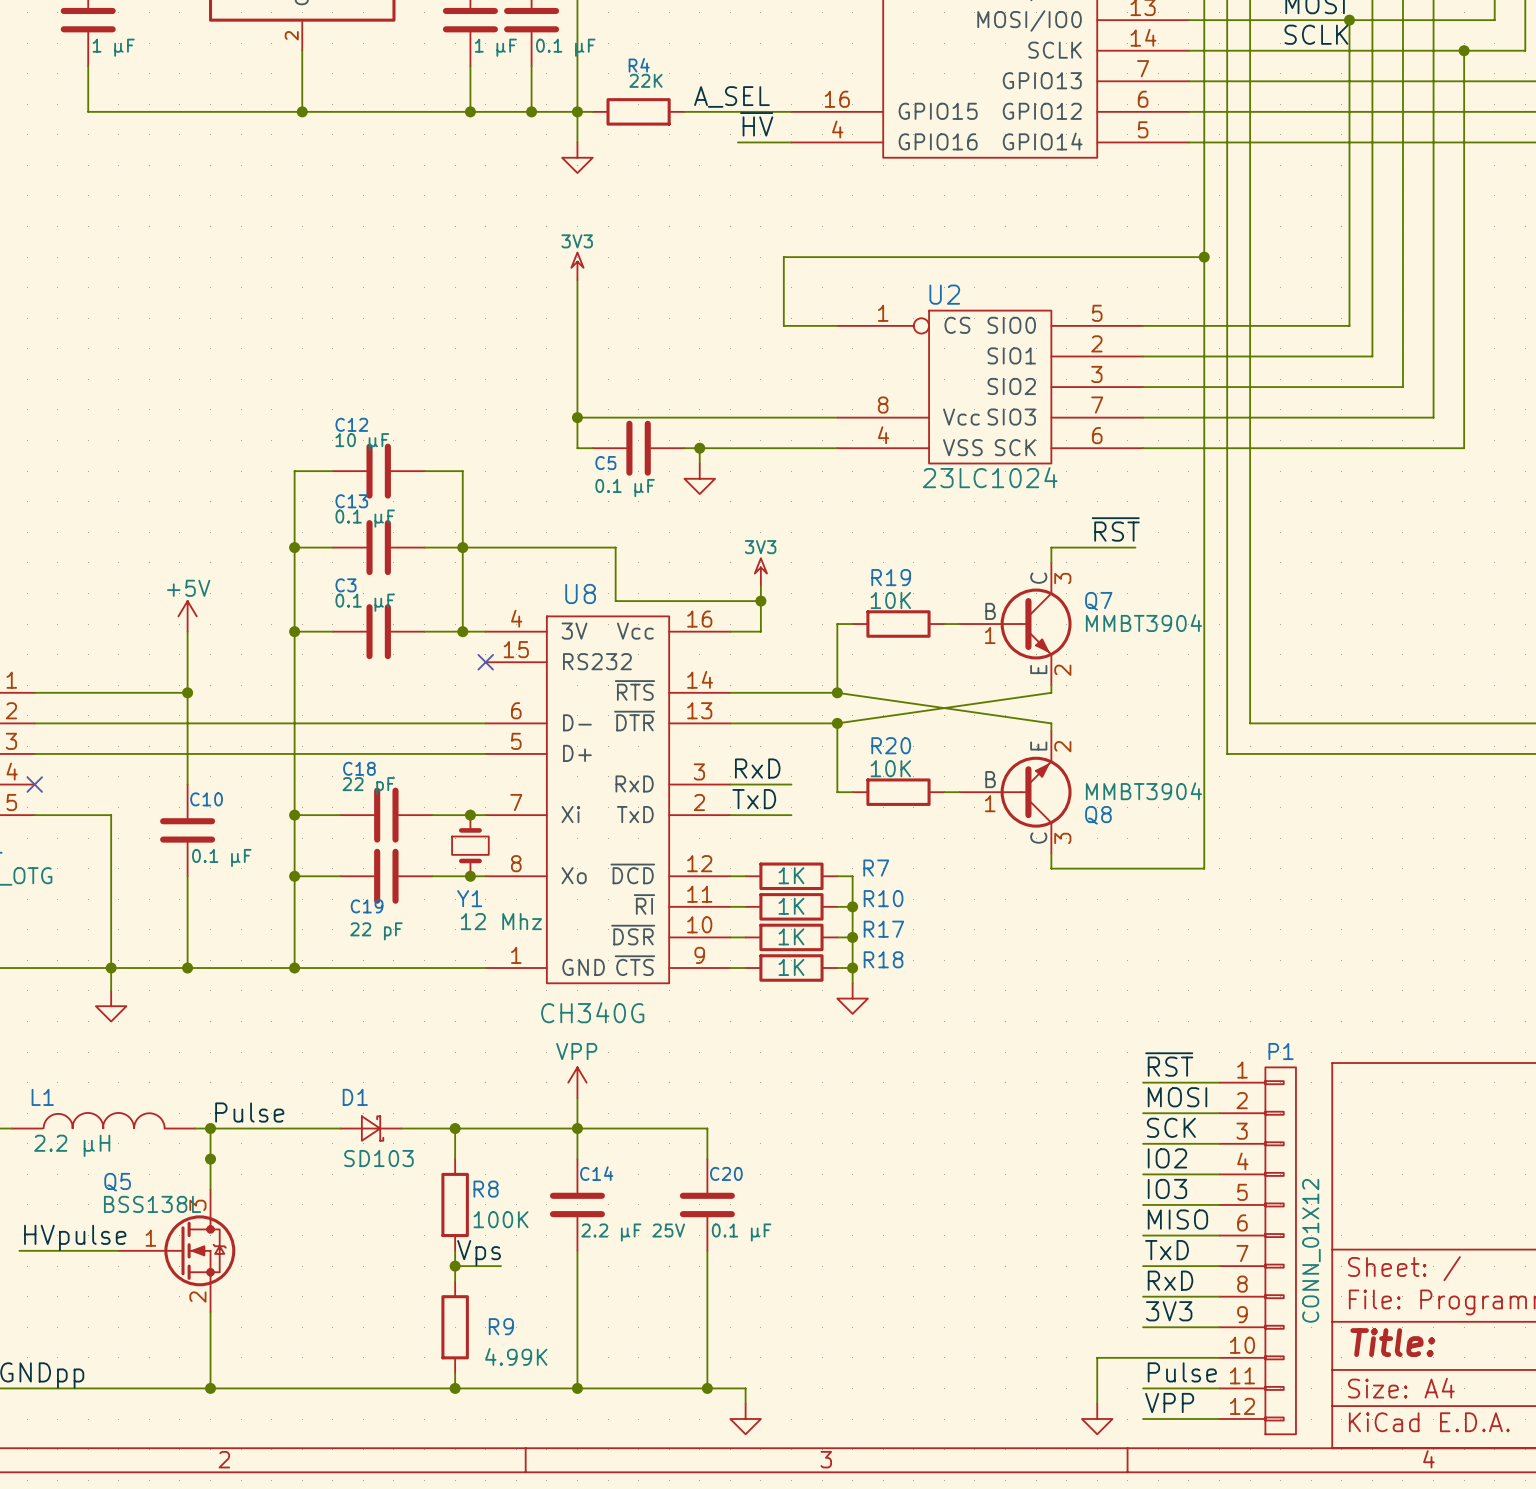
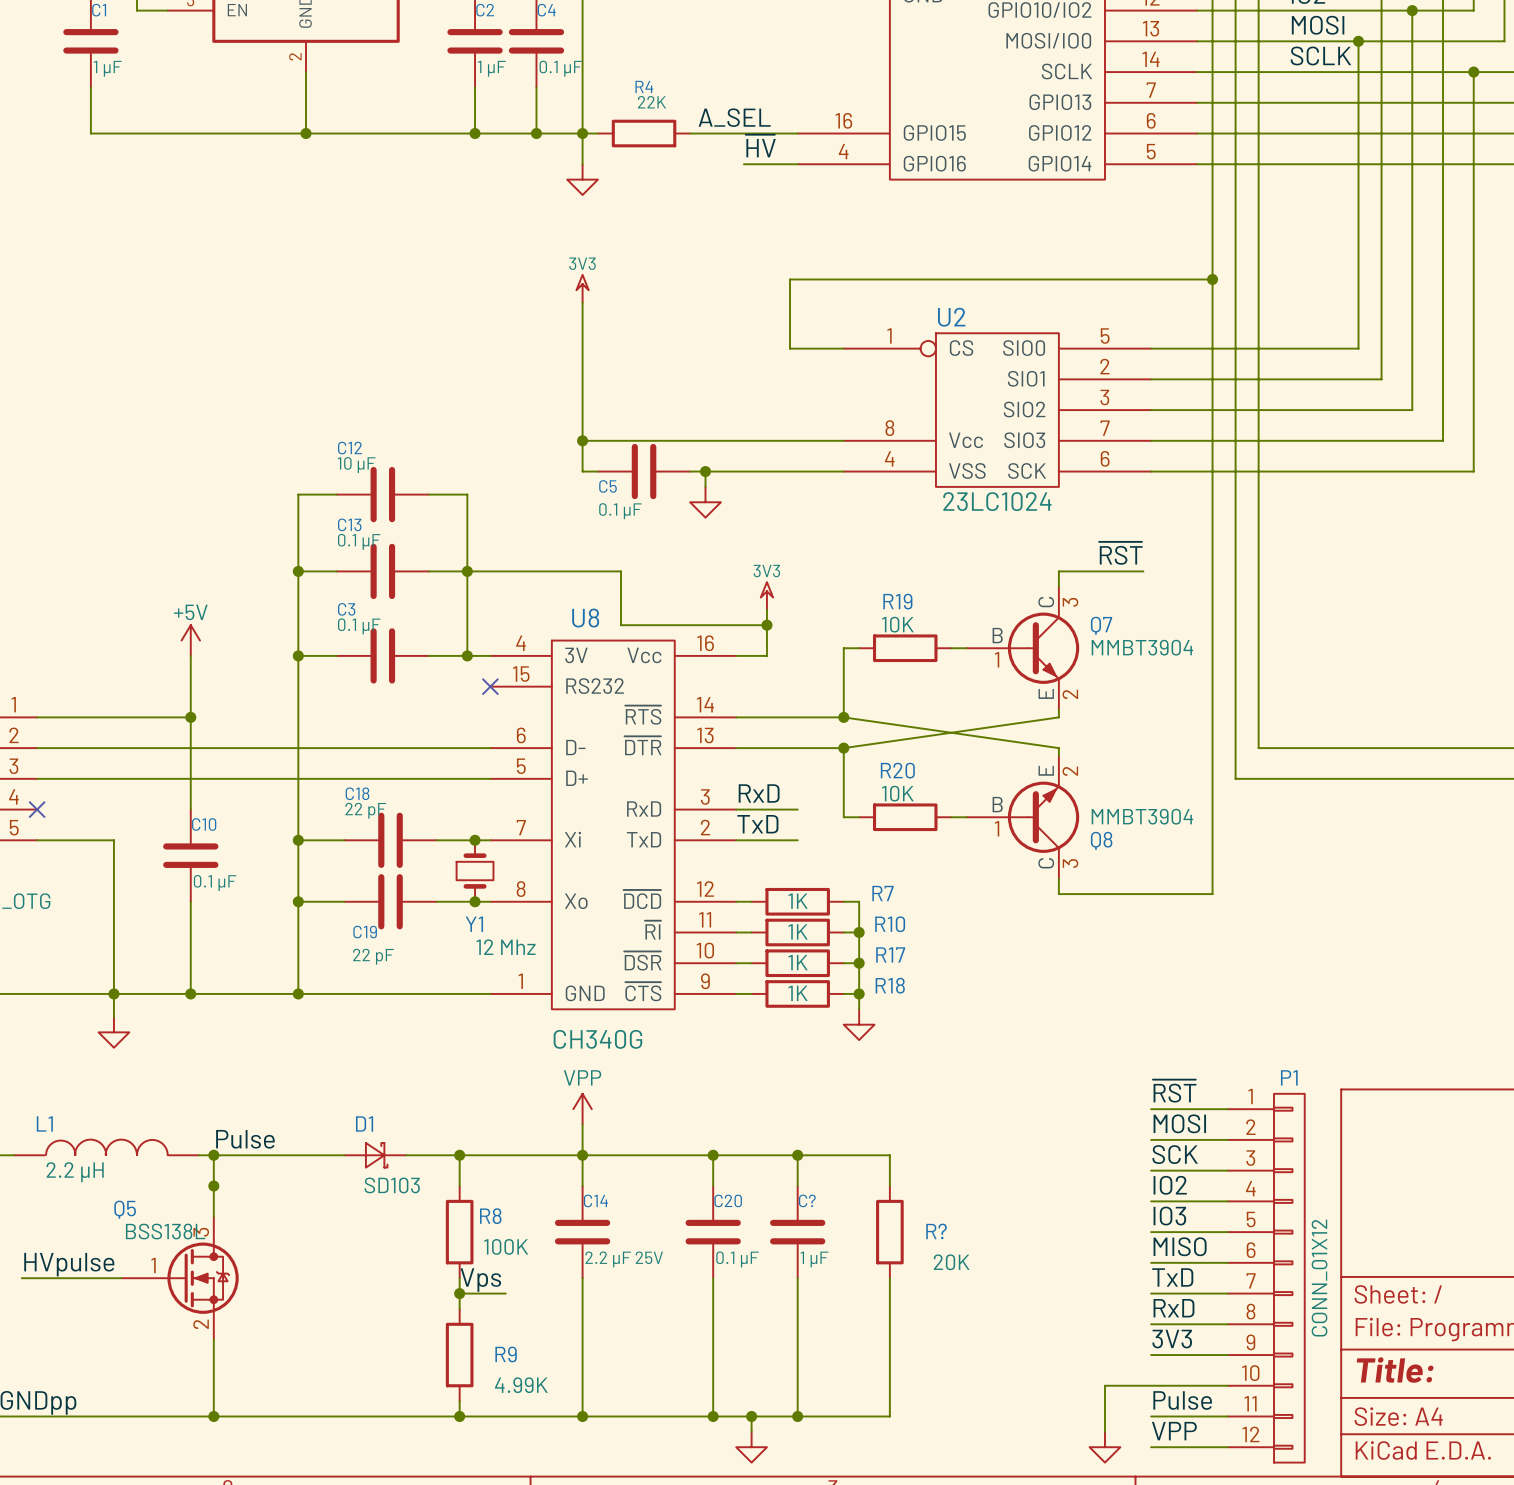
wire: none -> (713, 1155) (889, 1155) (889, 1186)
junction: none -> (713, 1155)
wire: none -> (797, 1155) (797, 1186)
junction: none -> (797, 1155)
C?: none -> 1 µF (797, 1232)
R?: none -> 20K (889, 1232)
wire: none -> (797, 1278) (797, 1416)
wire: none -> (889, 1278) (889, 1416) (751, 1416)
junction: none -> (751, 1416)
junction: none -> (797, 1416)

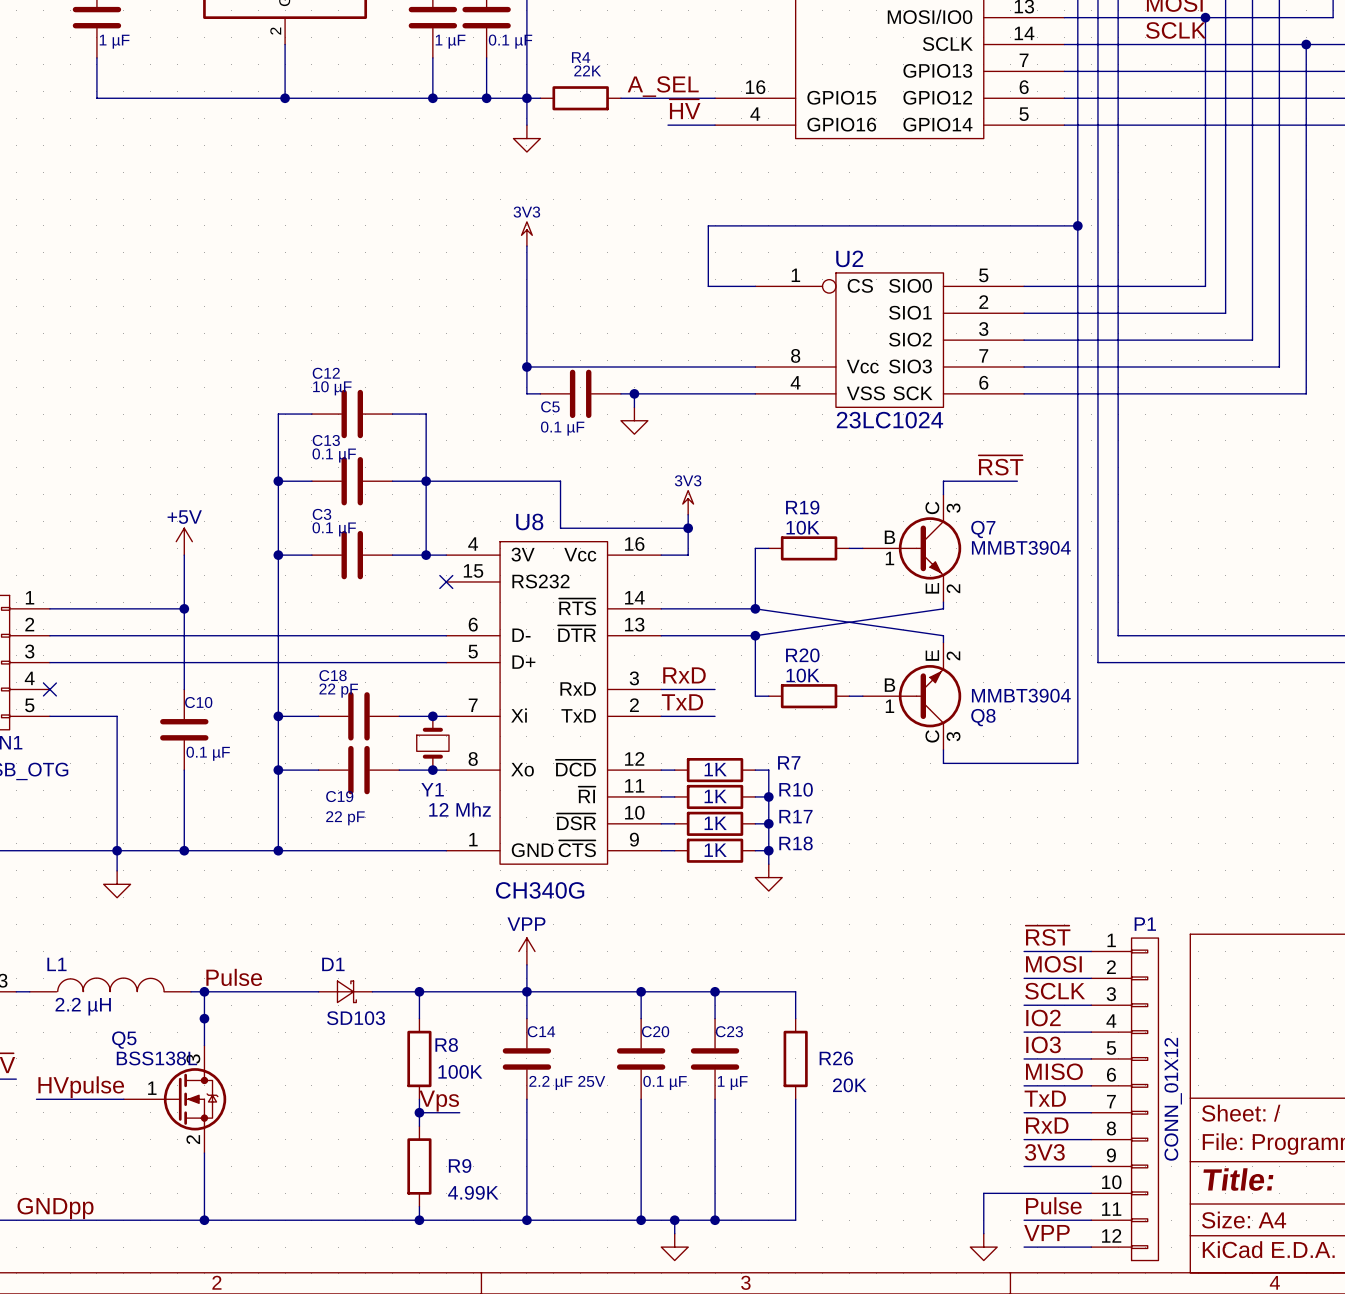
label: SCK (1175, 1154) -> SCLK (1055, 991)
C? name: C? (807, 1200) -> C23 (729, 1031)
R? name: R? (936, 1231) -> R26 (836, 1058)

